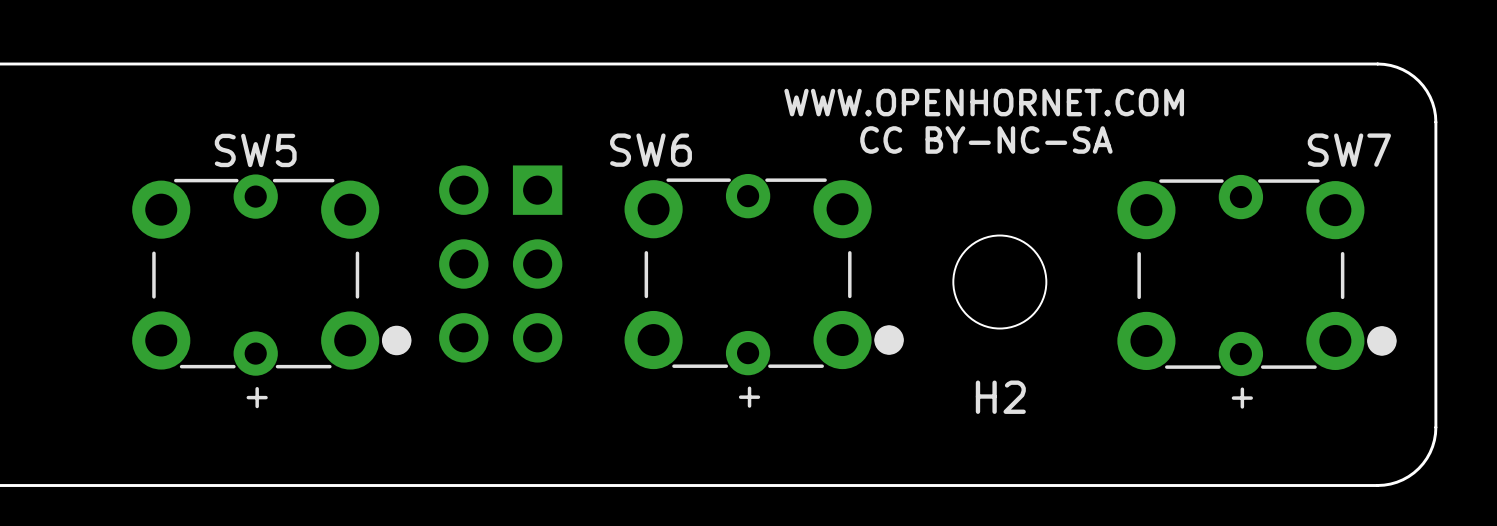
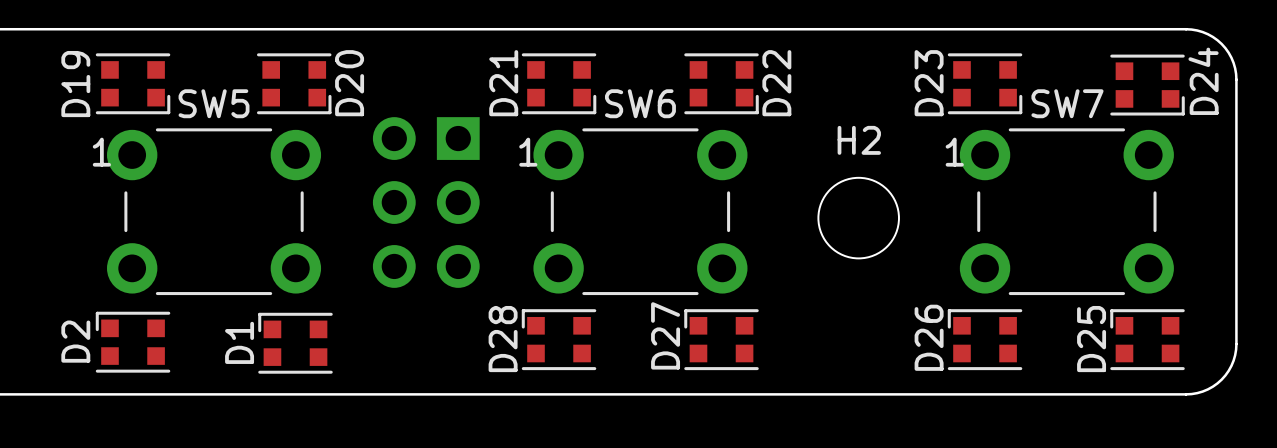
text: WWW.OPENHORNET.COM (984, 102) -> none
D19: none -> (133, 83)
D20: none -> (294, 83)
D21: none -> (559, 83)
D22: none -> (721, 83)
D23: none -> (985, 83)
D24: none -> (1147, 85)
text: CC BY-NC-SA (986, 139) -> none
SW6 name position: SW6 (651, 150) -> SW6 (640, 103)
SW7 name position: SW7 (1349, 150) -> SW7 (1067, 103)
SW6 footprint: [624, 173, 904, 376] -> [533, 128, 748, 296]
SW5 footprint: [132, 174, 412, 376] -> [107, 128, 322, 296]
SW7 footprint: [1117, 174, 1397, 377] -> [959, 128, 1174, 296]
H2 name position: H2 (1000, 397) -> H2 (859, 140)
D28: none -> (559, 339)
D27: none -> (721, 339)
D26: none -> (985, 339)
D25: none -> (1147, 339)
D2: none -> (133, 342)
D1: none -> (295, 343)

